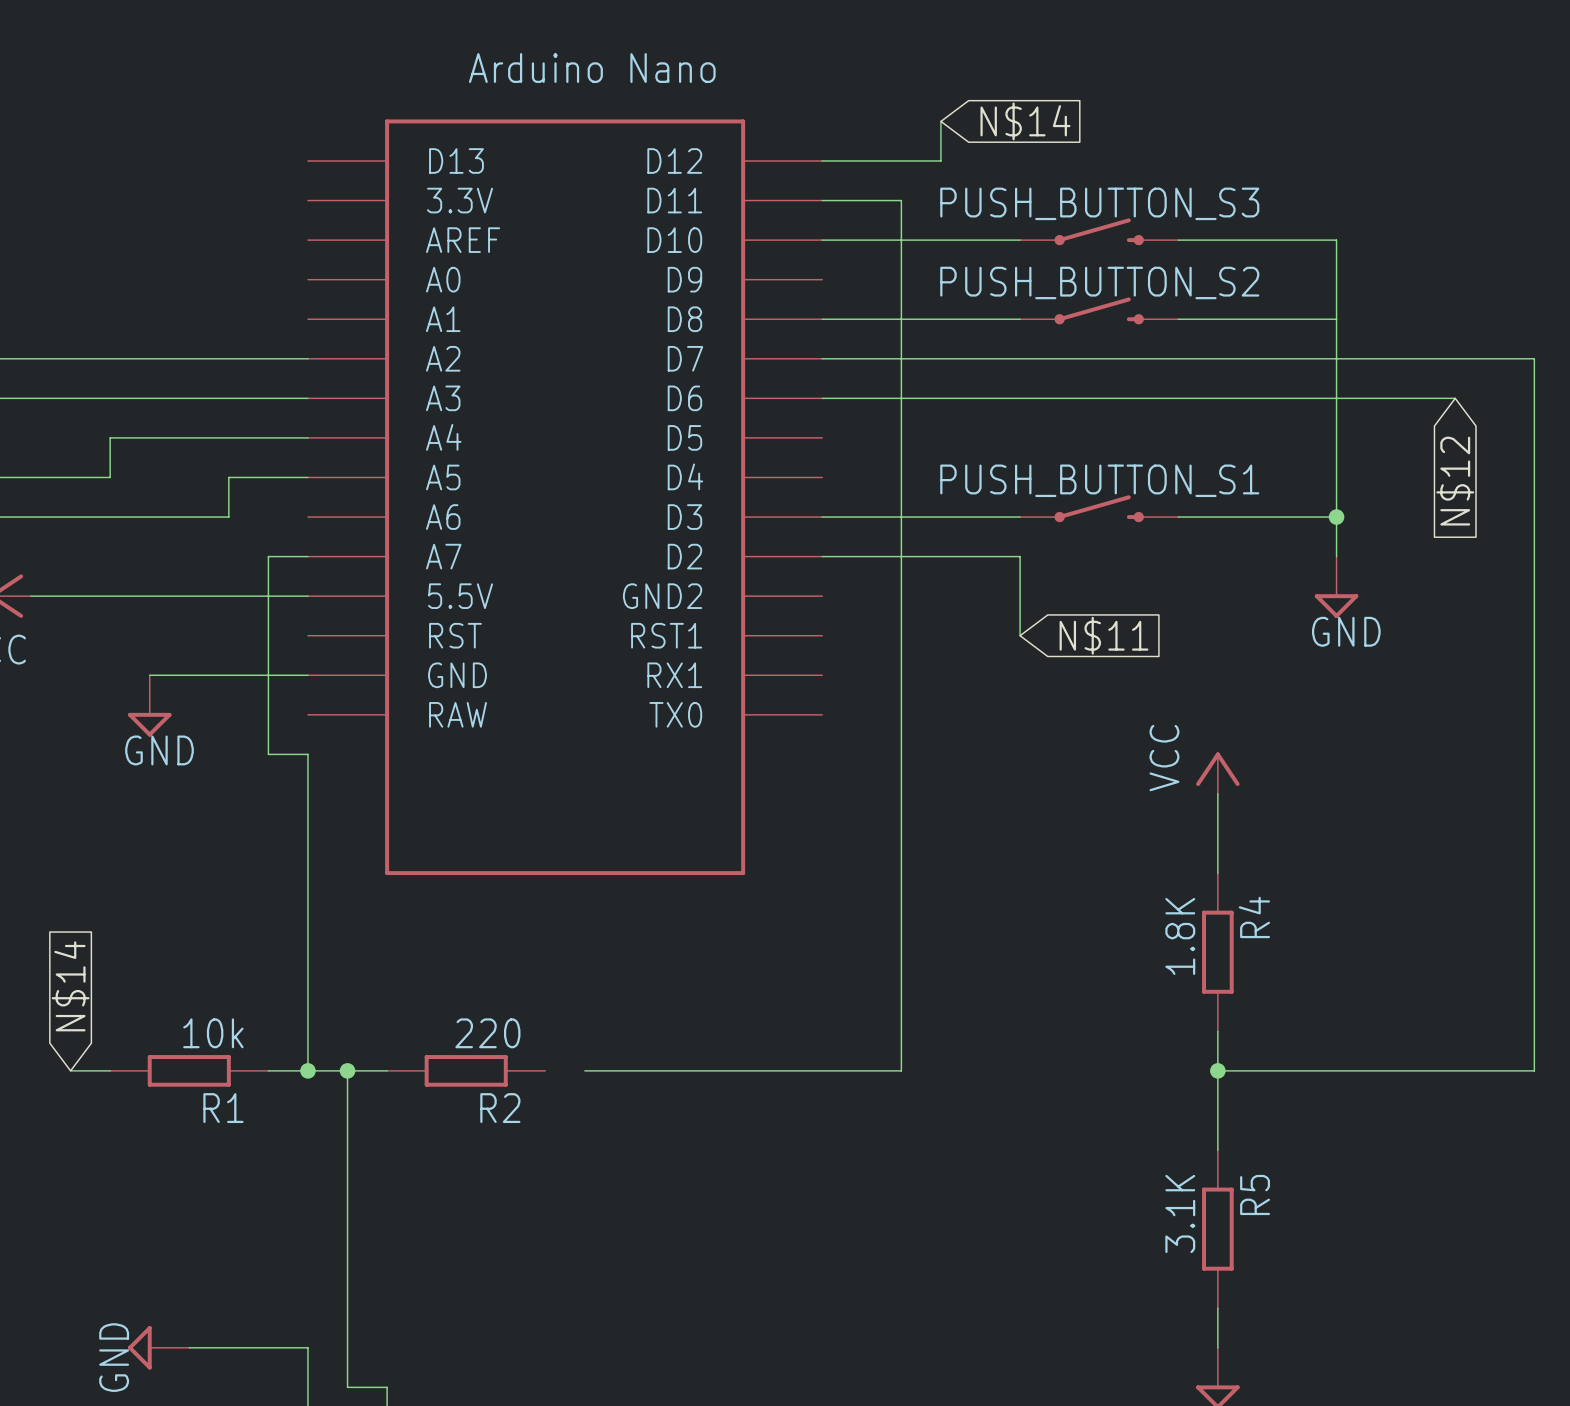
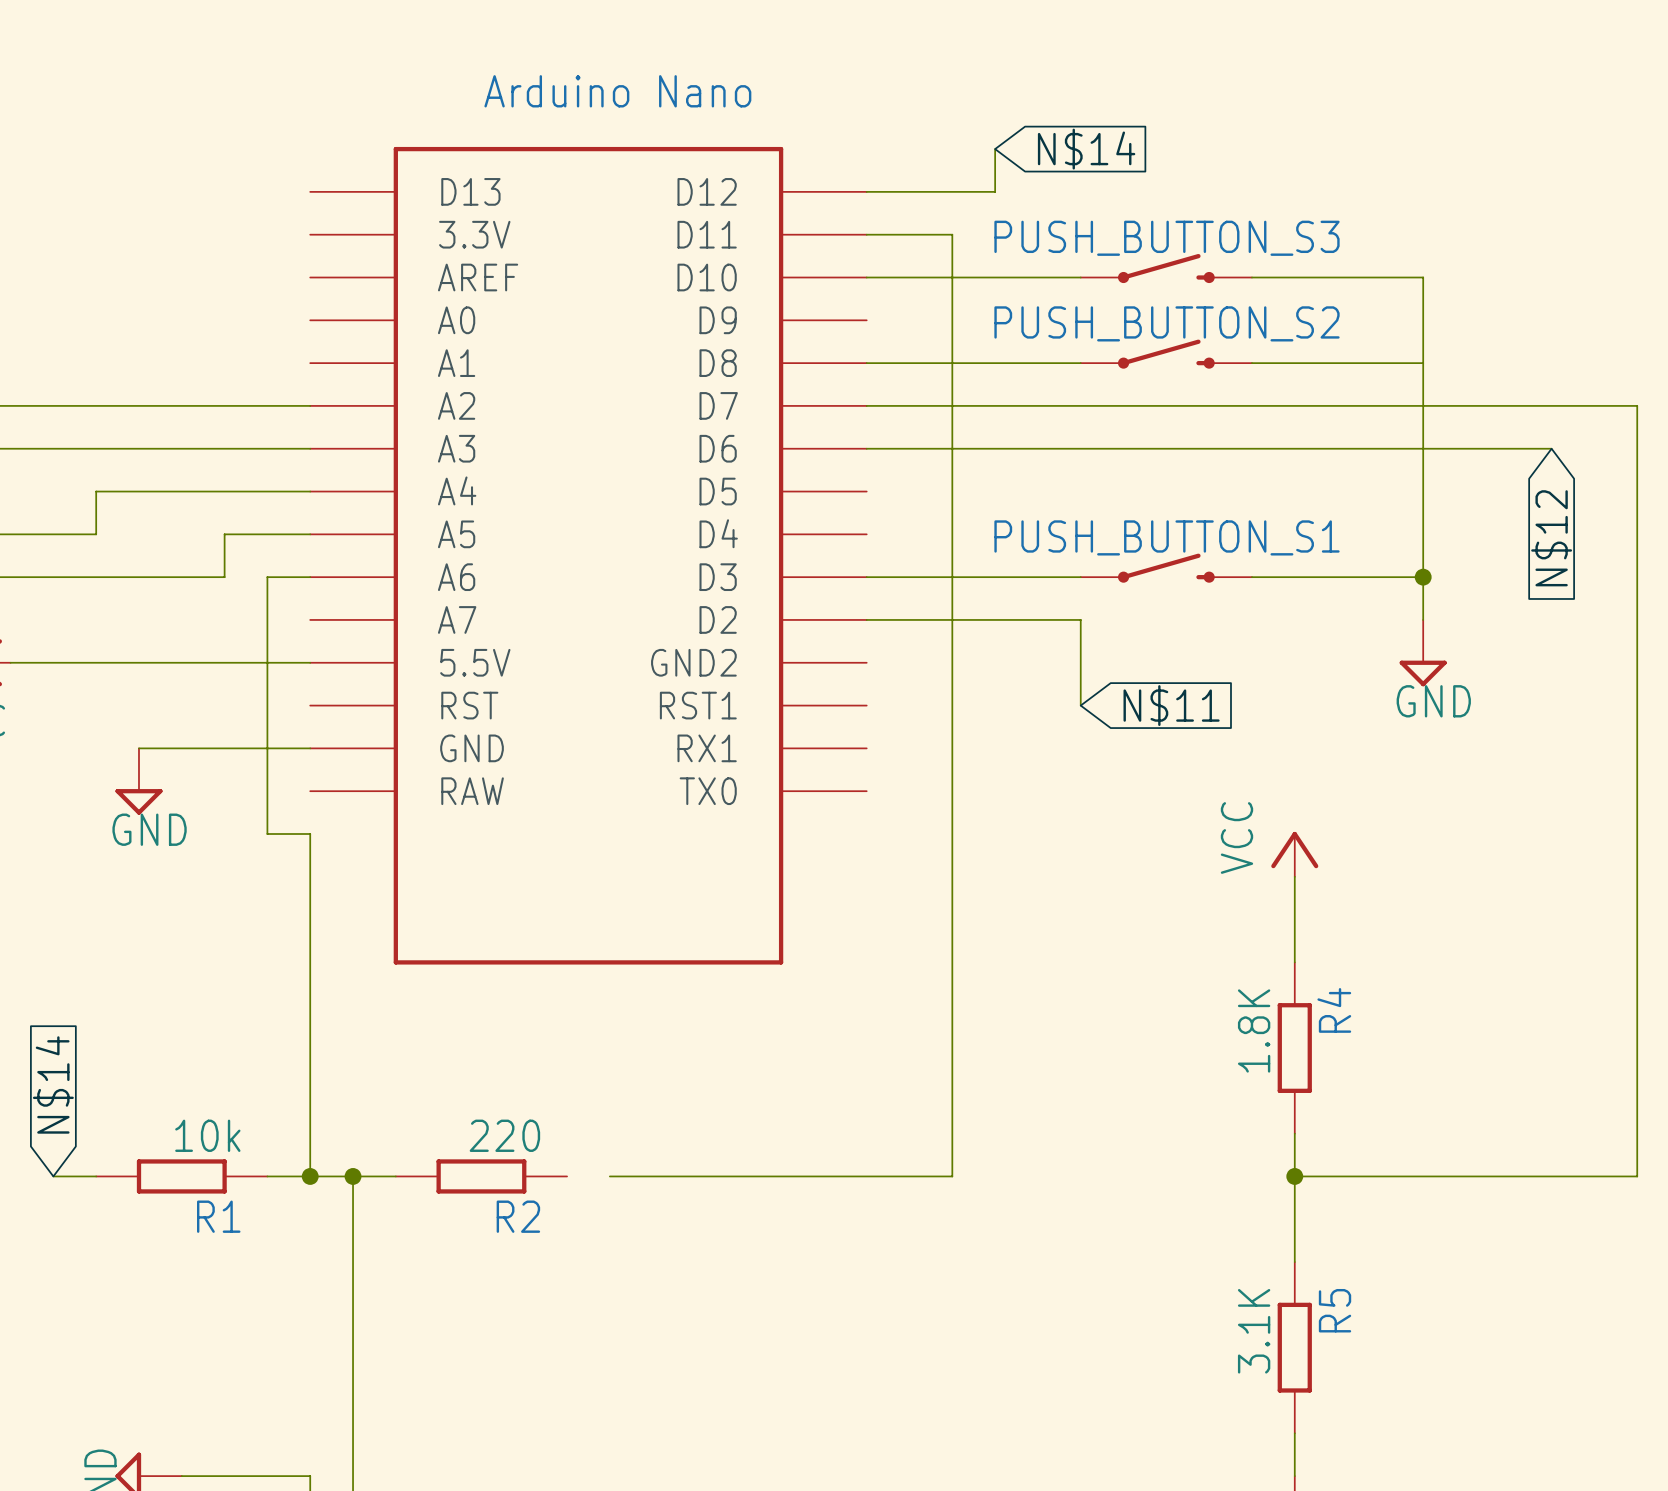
wire: (268, 556) (307, 556) -> (267, 619) (267, 577) (310, 577)

